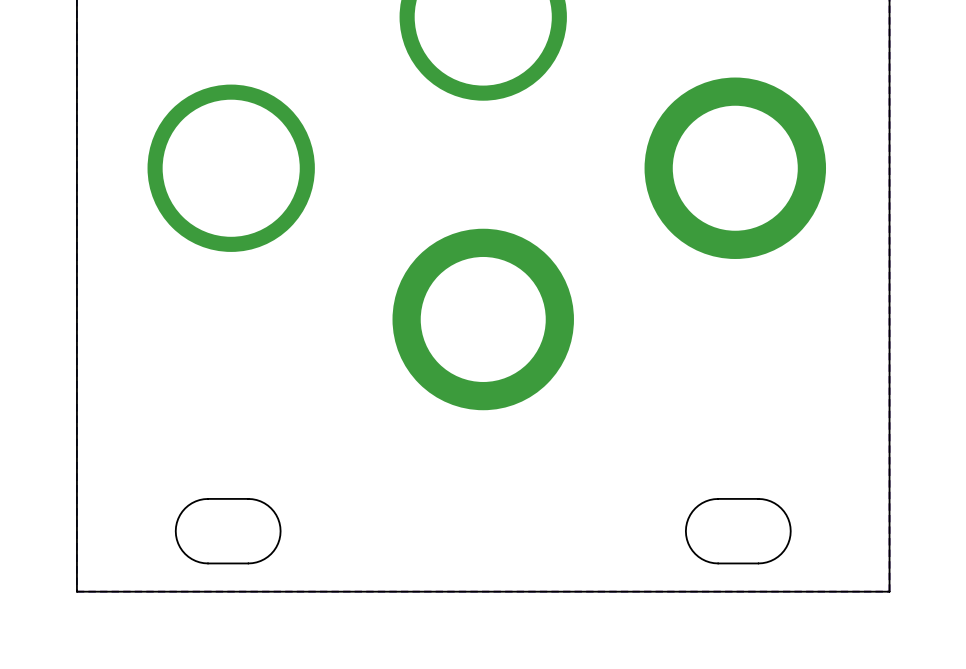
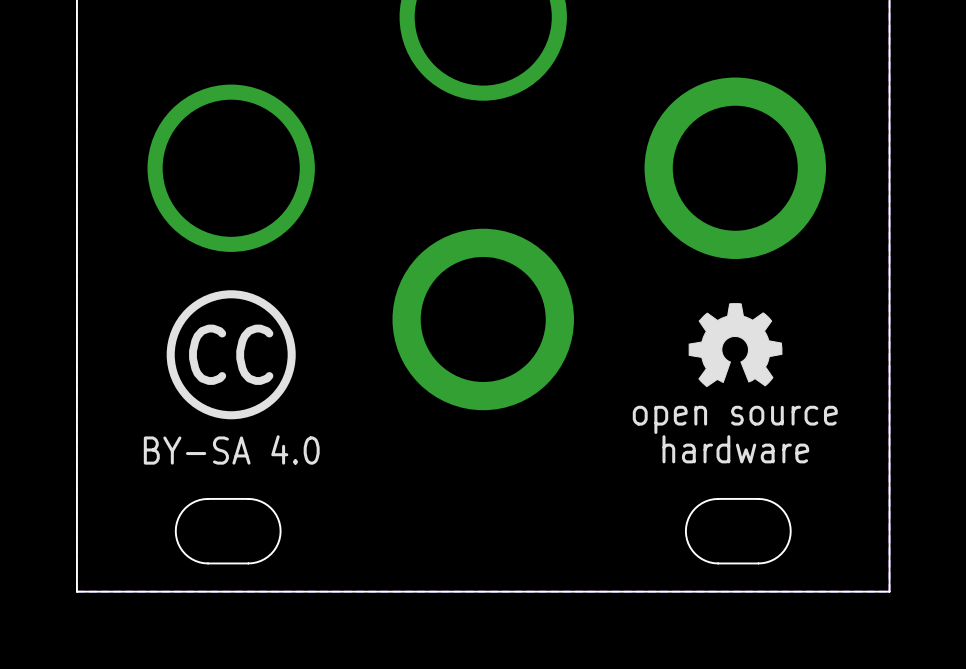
drawing: none -> [166, 290, 296, 420]
drawing: none -> [688, 303, 783, 388]
text: none -> open source (735, 419)
text: none -> BY-SA 4.0 (231, 449)
text: none -> hardware (735, 449)

